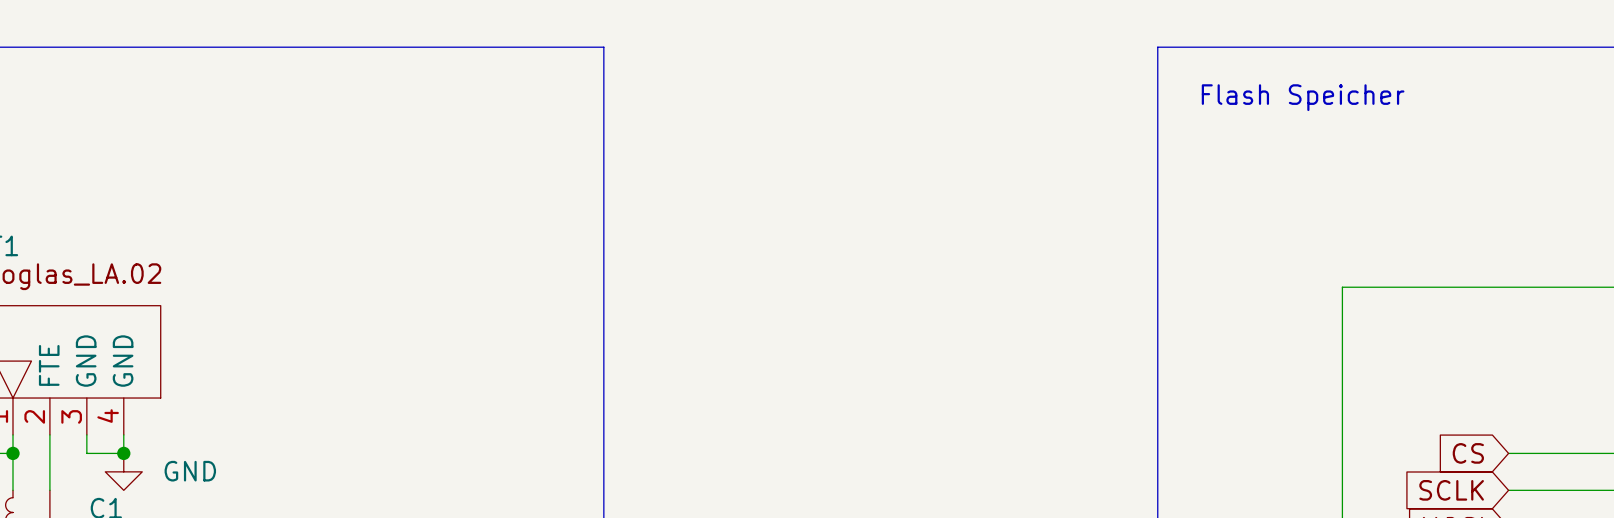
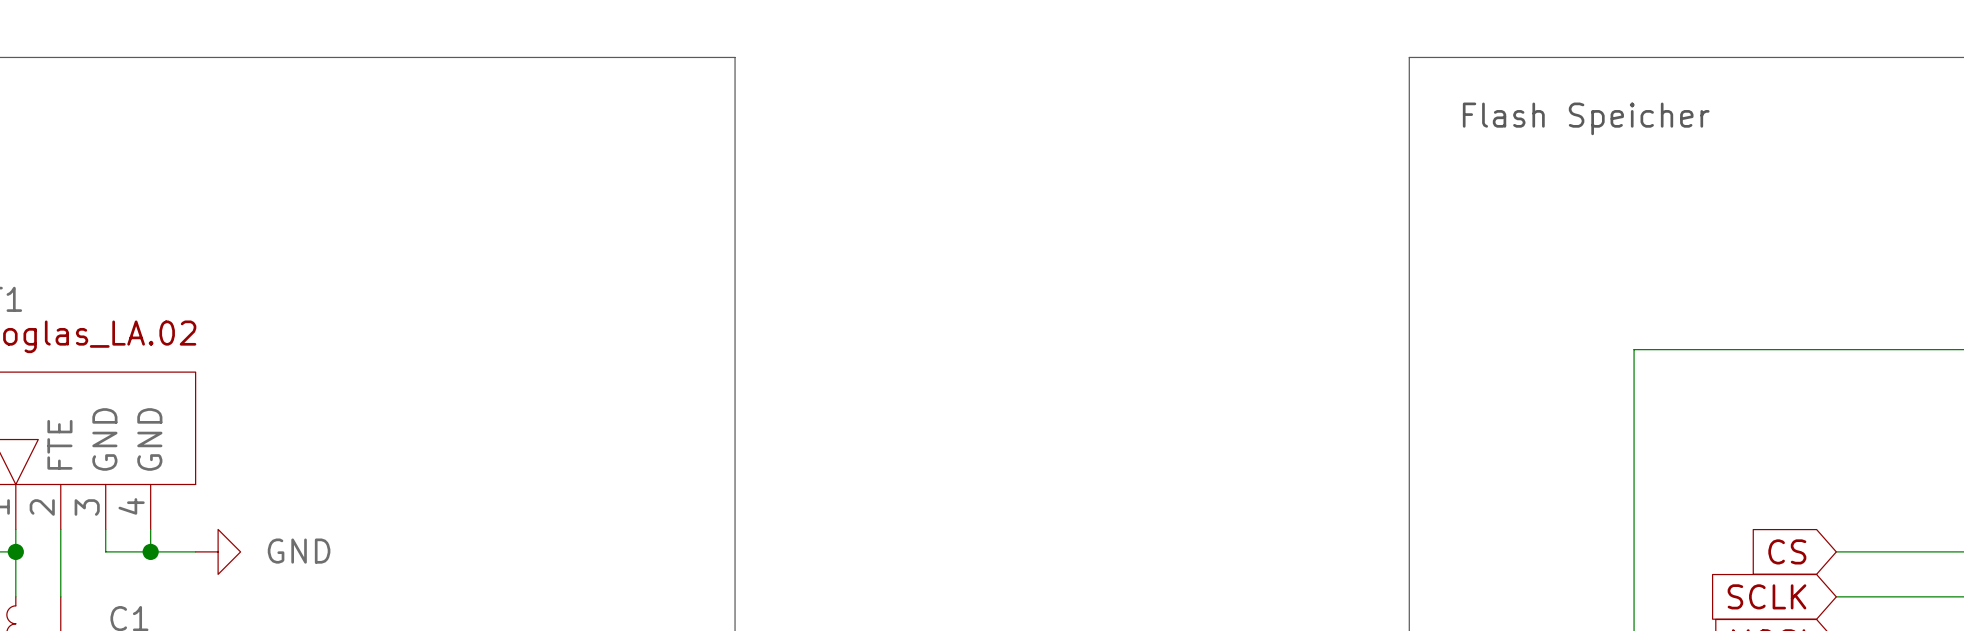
wire: none -> (150, 551) (195, 551)
power symbol rotation: 0° (123, 471) -> 90° counterclockwise (218, 551)
power symbol position: GND (123, 471) -> GND (218, 551)

